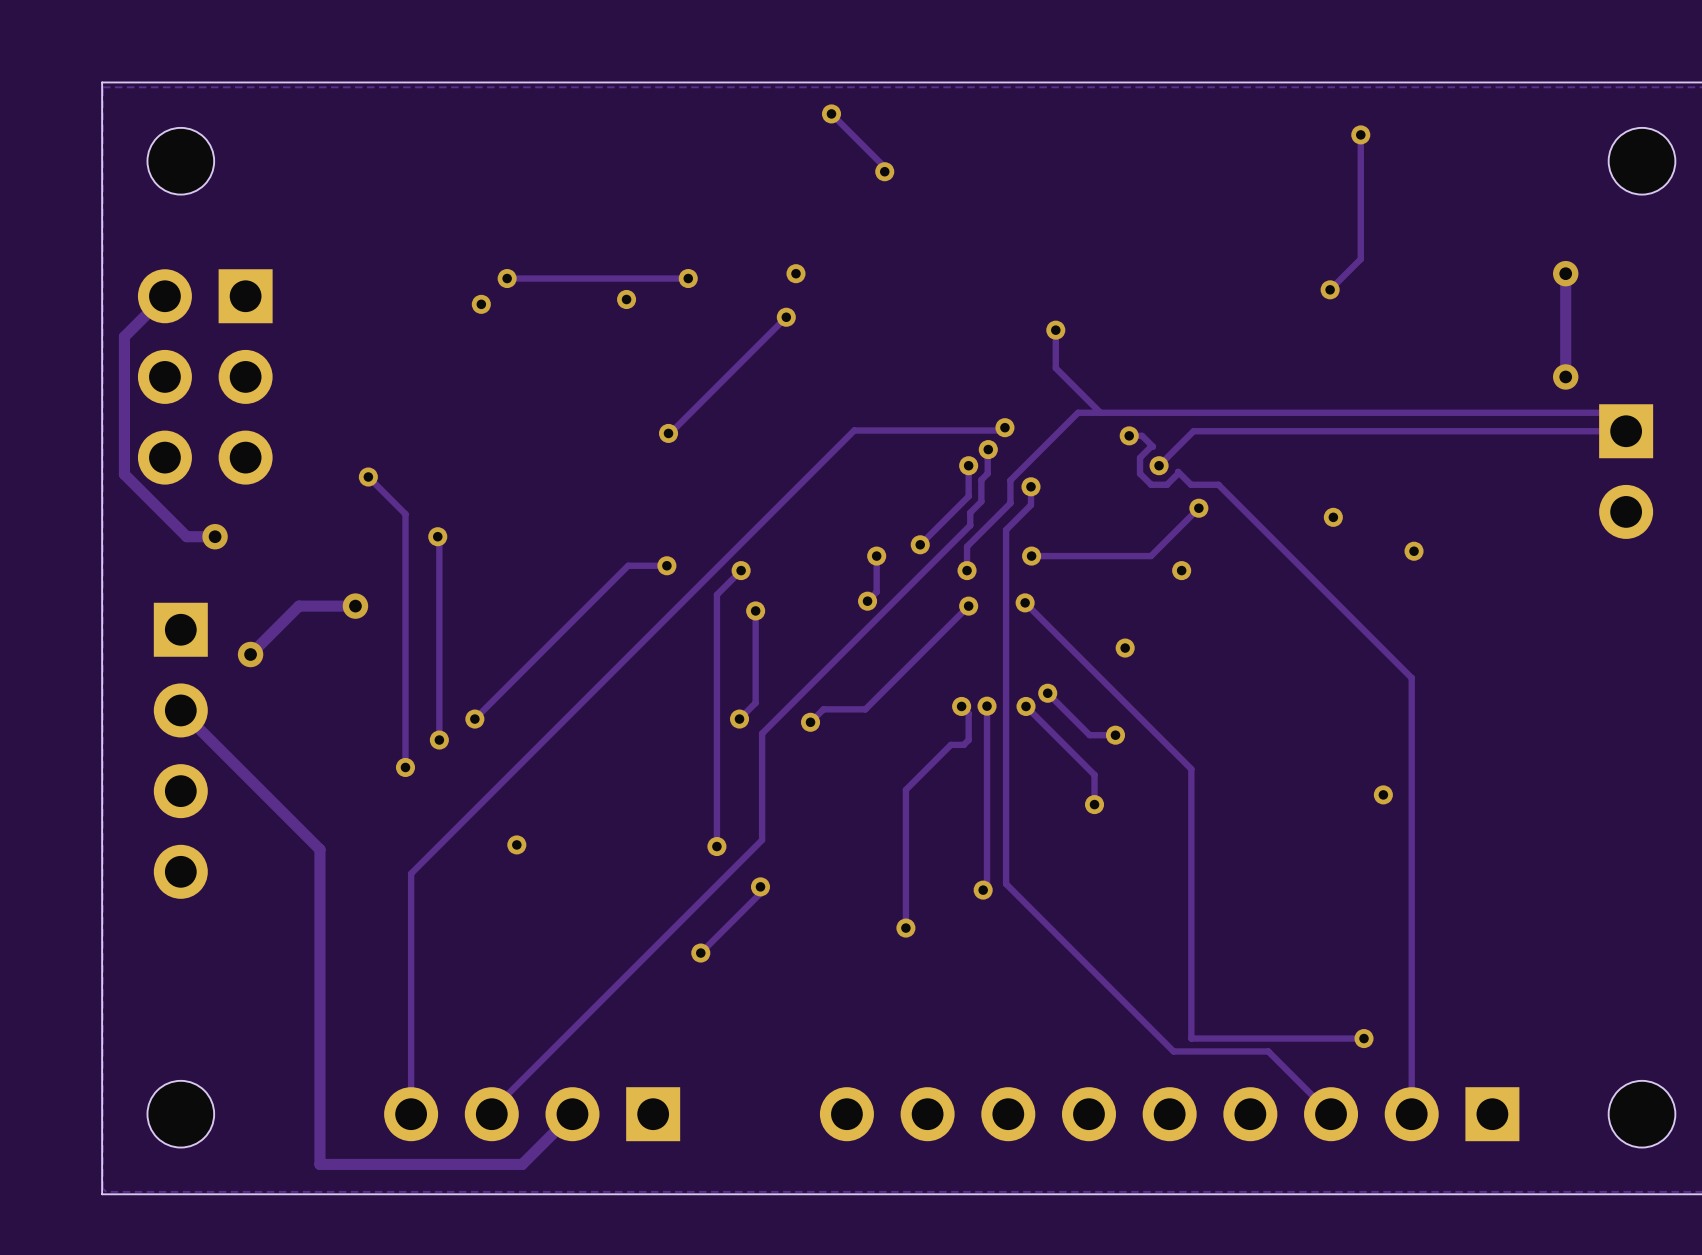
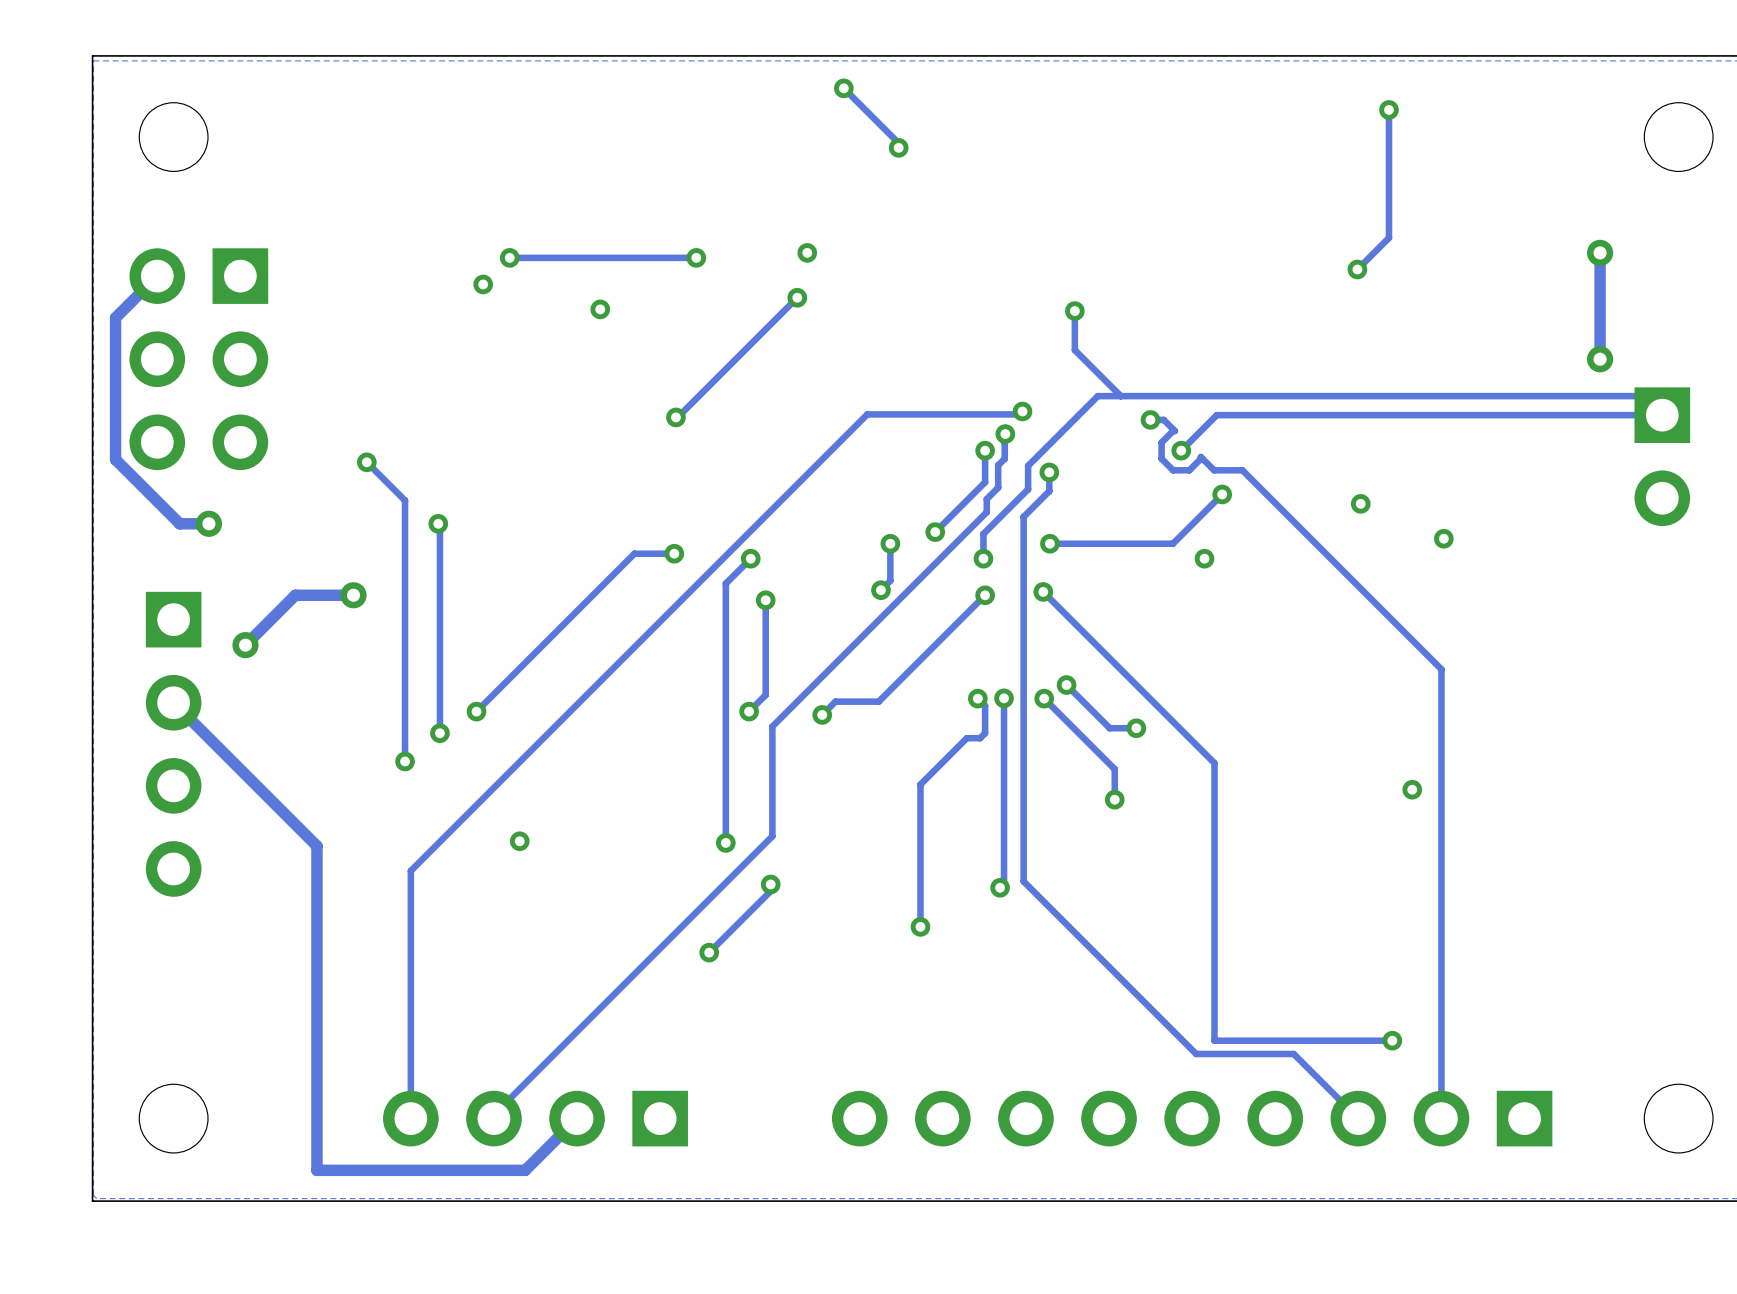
via position: (626, 299) -> (600, 309)
via: (1125, 648) -> none

